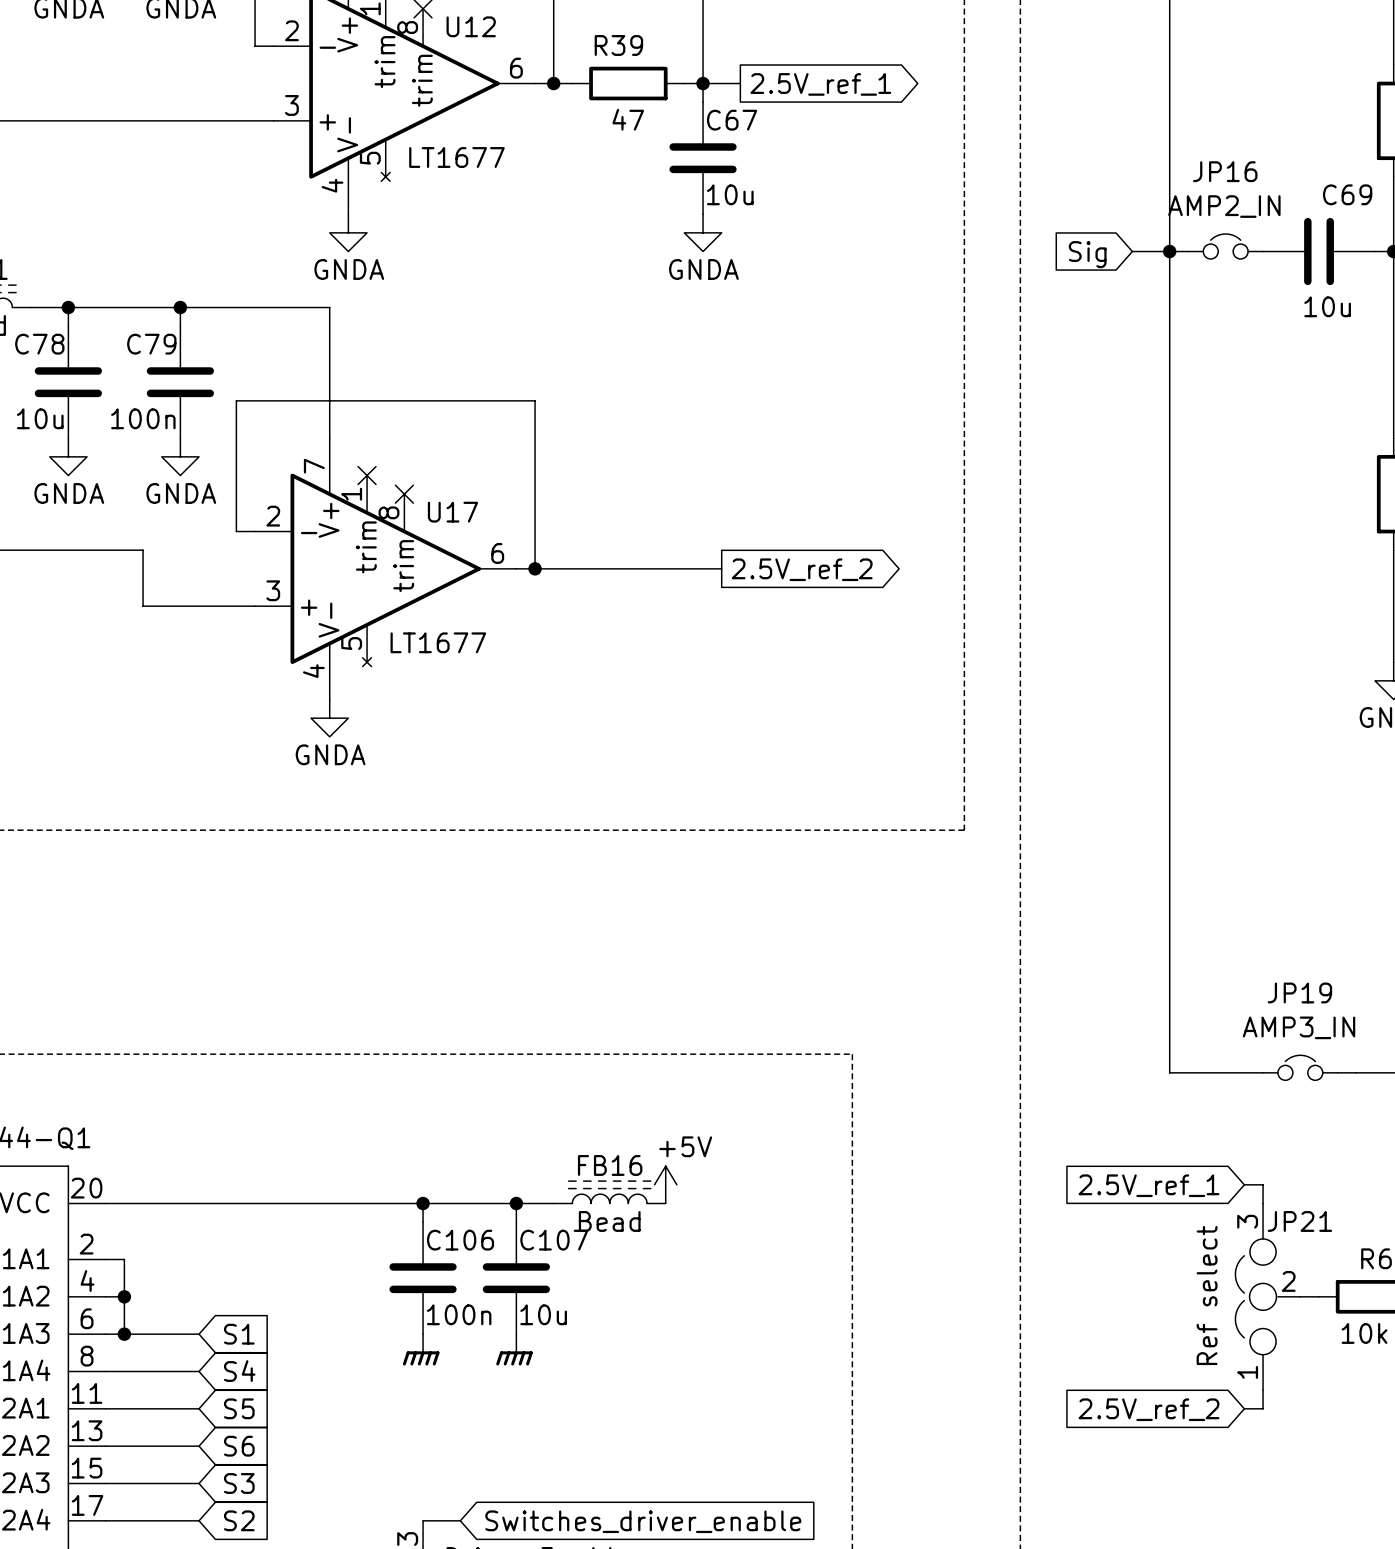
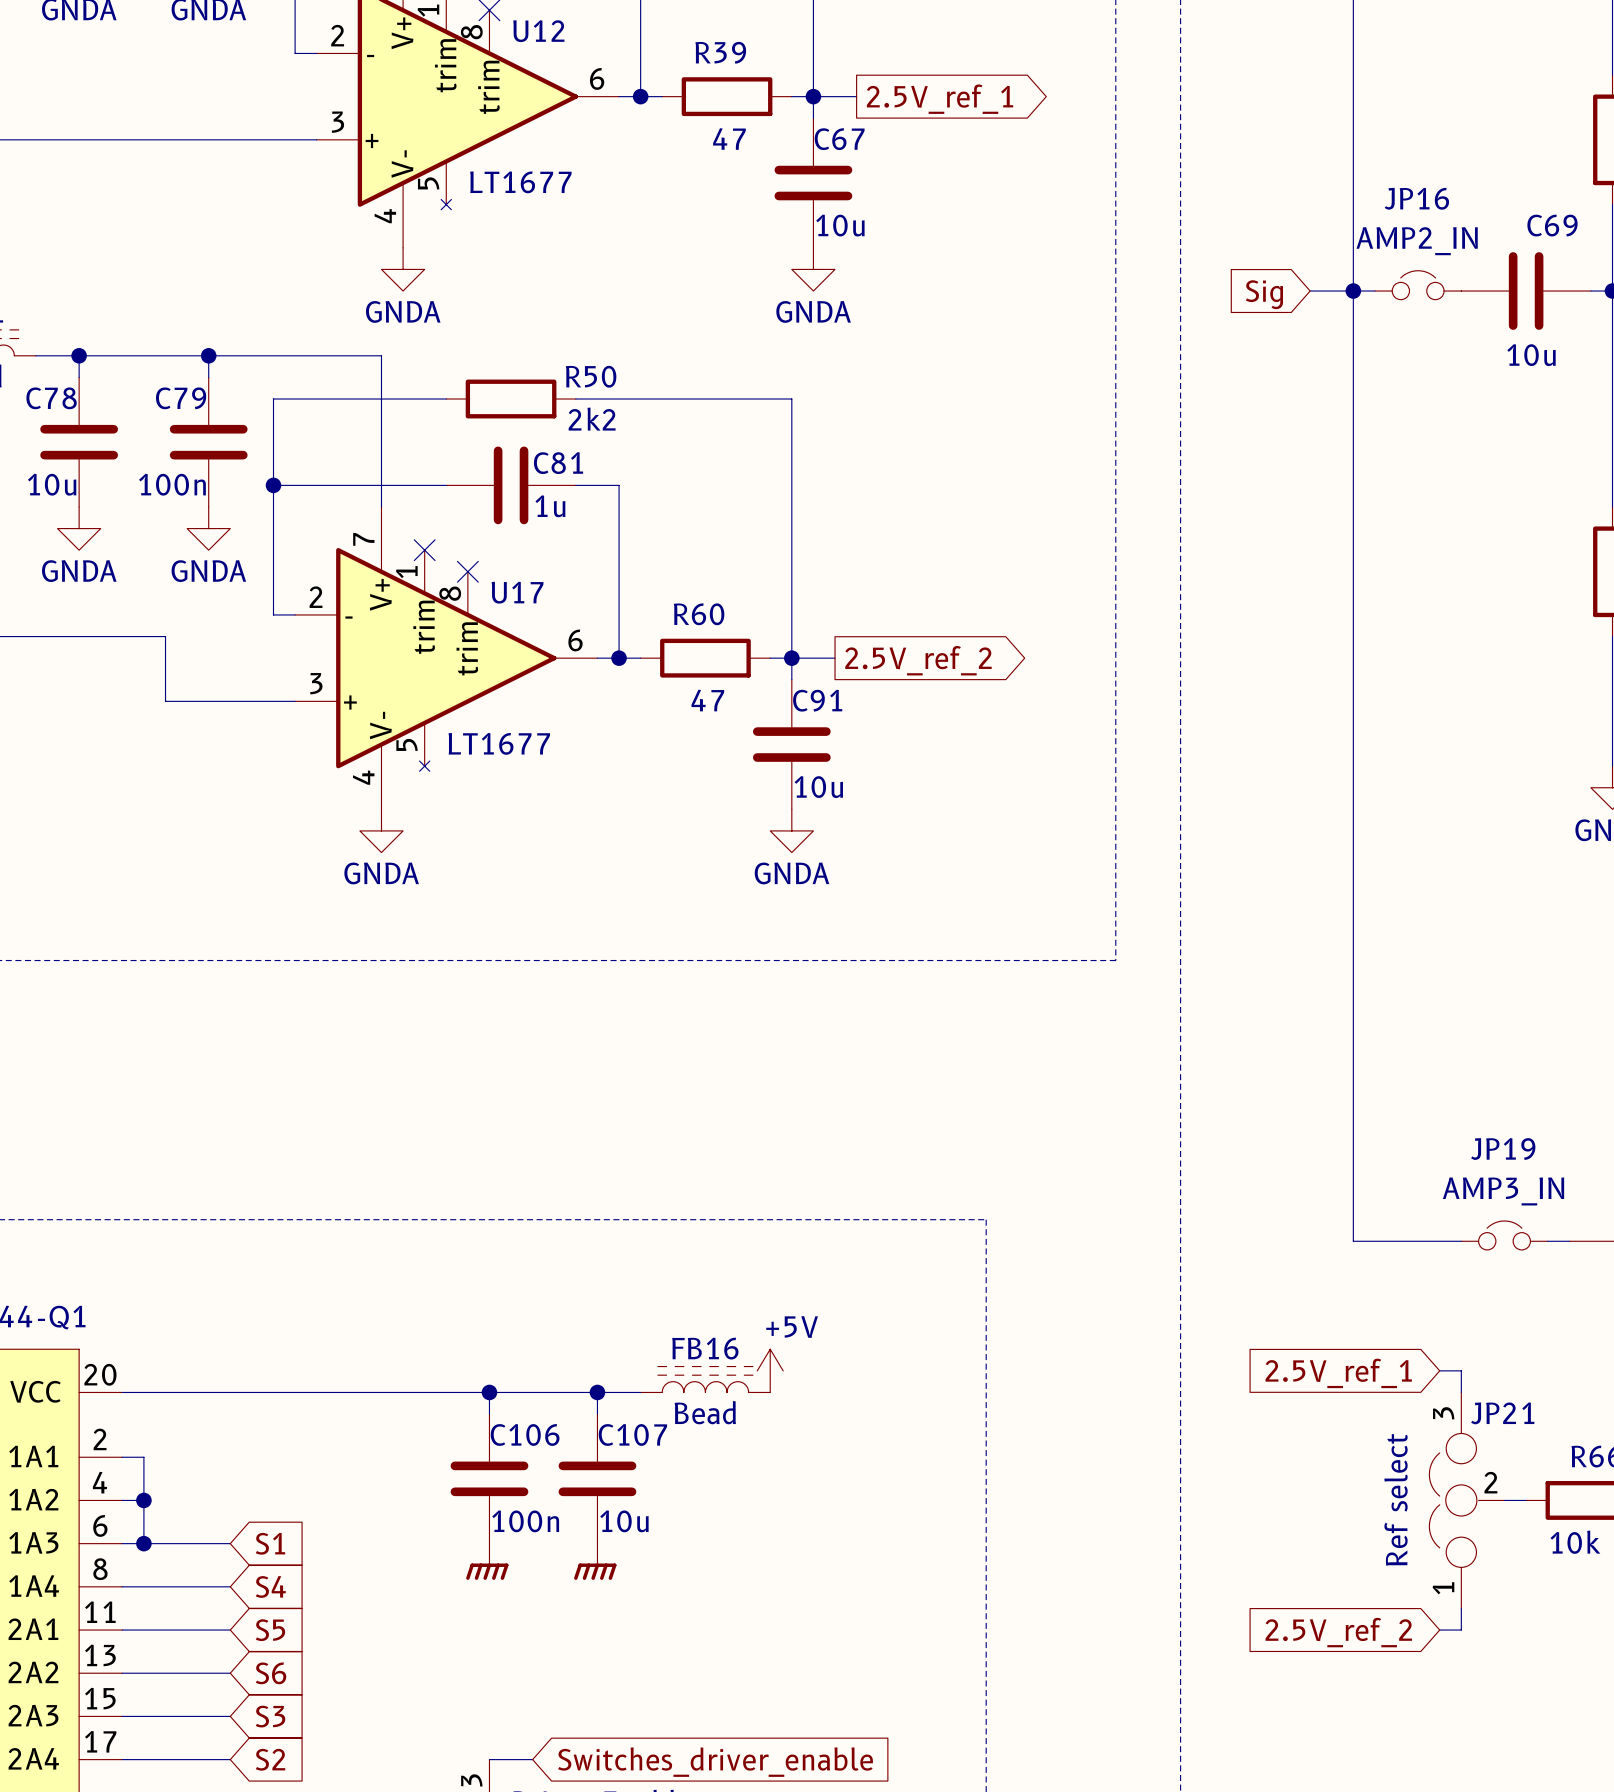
R50: none -> 2k2 (511, 399)
wire: none -> (575, 399) (791, 399) (791, 679)
wire: (236, 400) (535, 400) (535, 419) -> (273, 463) (273, 399) (446, 399)
wire: none -> (273, 485) (446, 485)
junction: none -> (273, 485)
C81: none -> 1u (511, 485)
wire: none -> (575, 485) (619, 485)
wire: (553, 568) (665, 568) -> none
R60: none -> 47 (705, 658)
junction: none -> (791, 658)
C91: none -> 10u (791, 744)
power symbol: none -> GNDA (791, 830)

